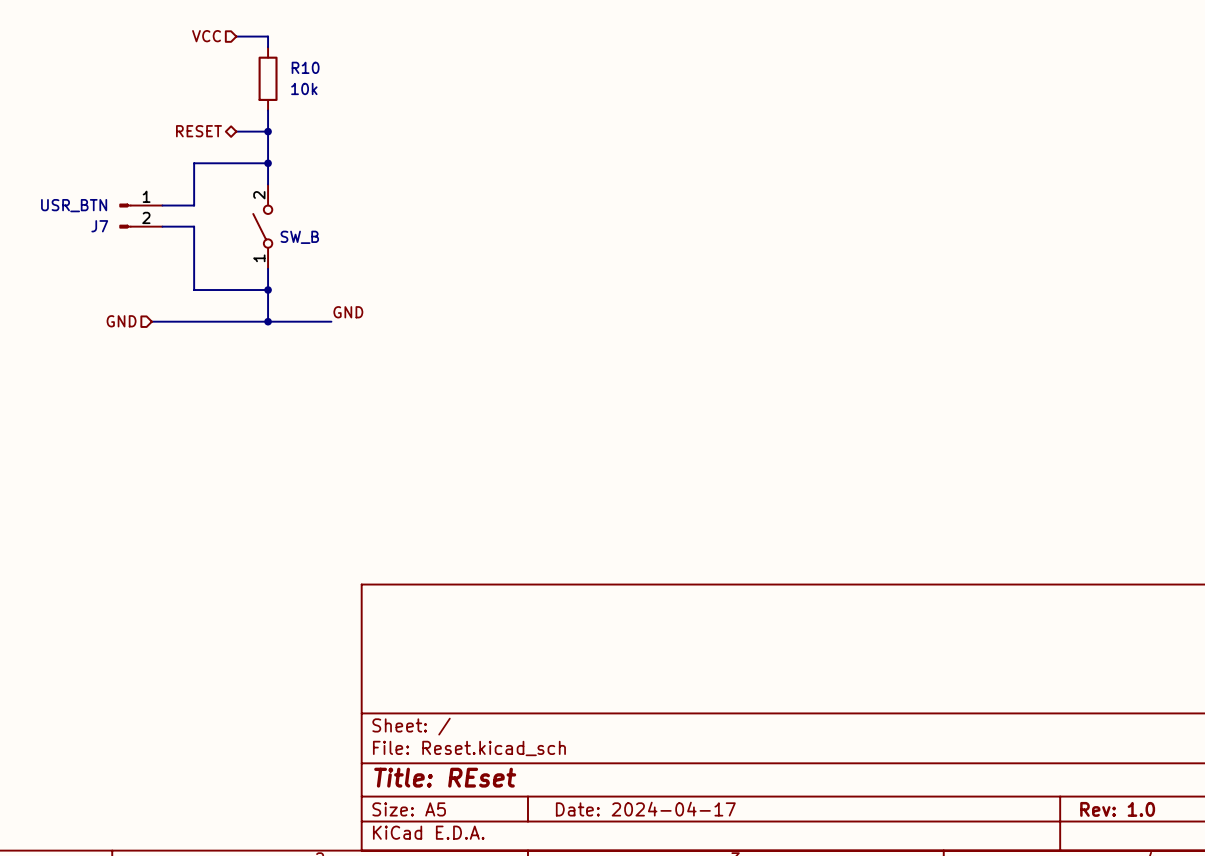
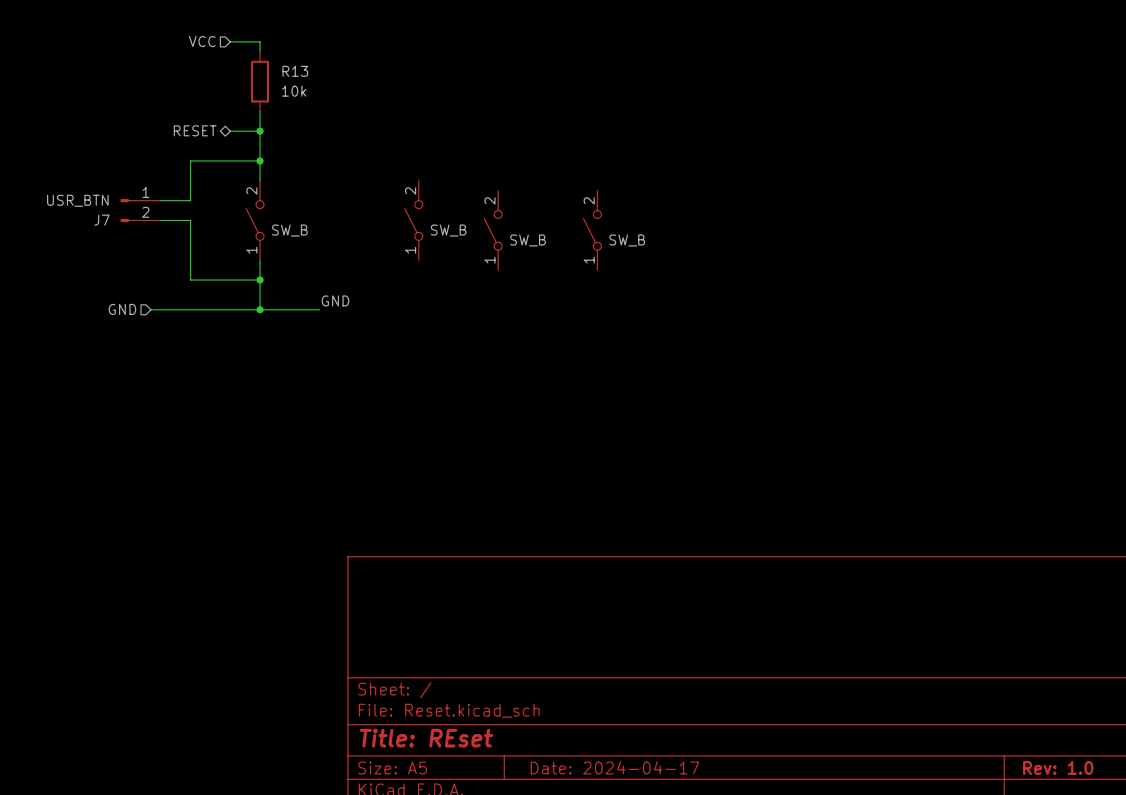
R10 name: R10 (305, 67) -> R13 (295, 71)
part: none -> SW_B (413, 220)
part: none -> SW_B (493, 230)
part: none -> SW_B (592, 230)

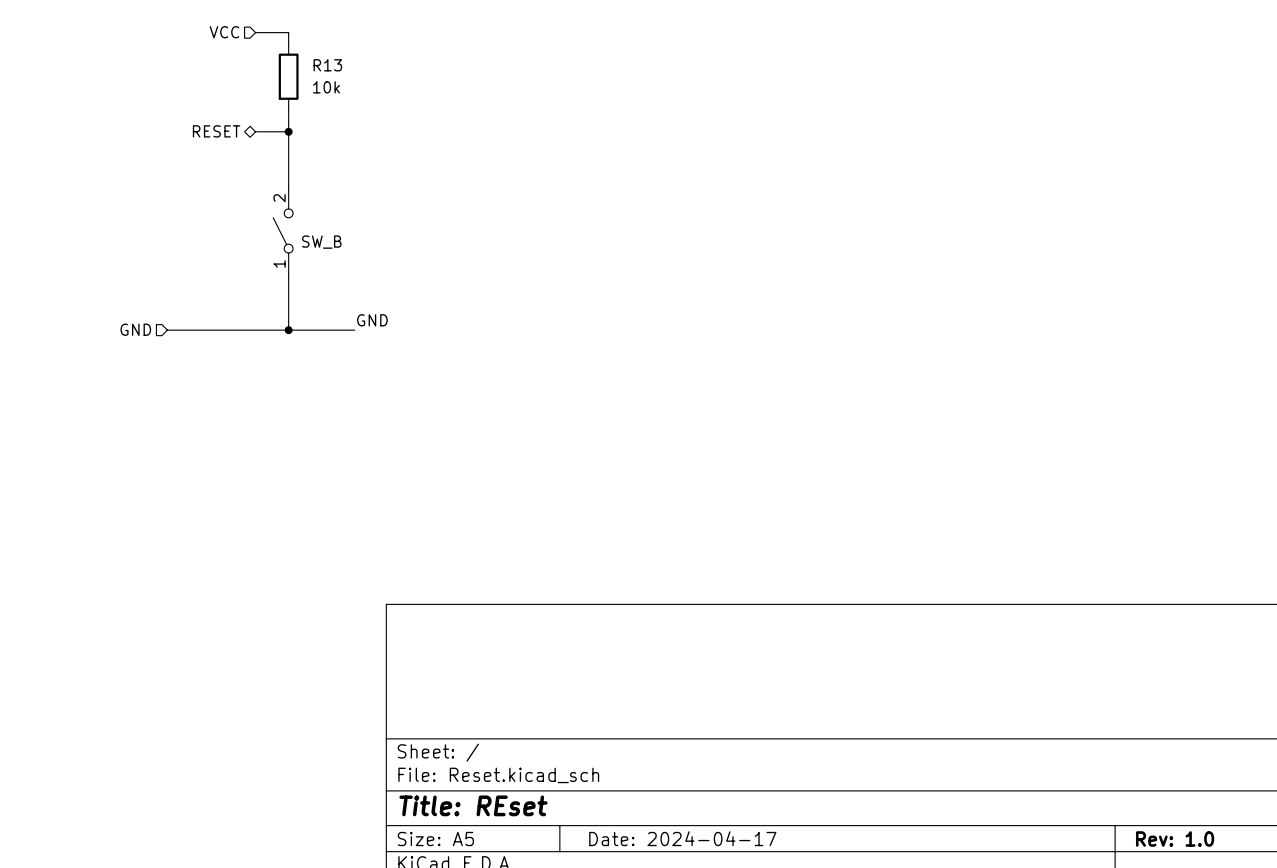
wire: (260, 160) (190, 160) (190, 200) (160, 200) -> none
junction: (260, 160) -> none
J7: USR_BTN (140, 210) -> none
wire: (160, 220) (190, 220) (190, 280) (260, 280) -> none
part: SW_B (413, 220) -> none
part: SW_B (493, 230) -> none
part: SW_B (592, 230) -> none
junction: (260, 280) -> none

